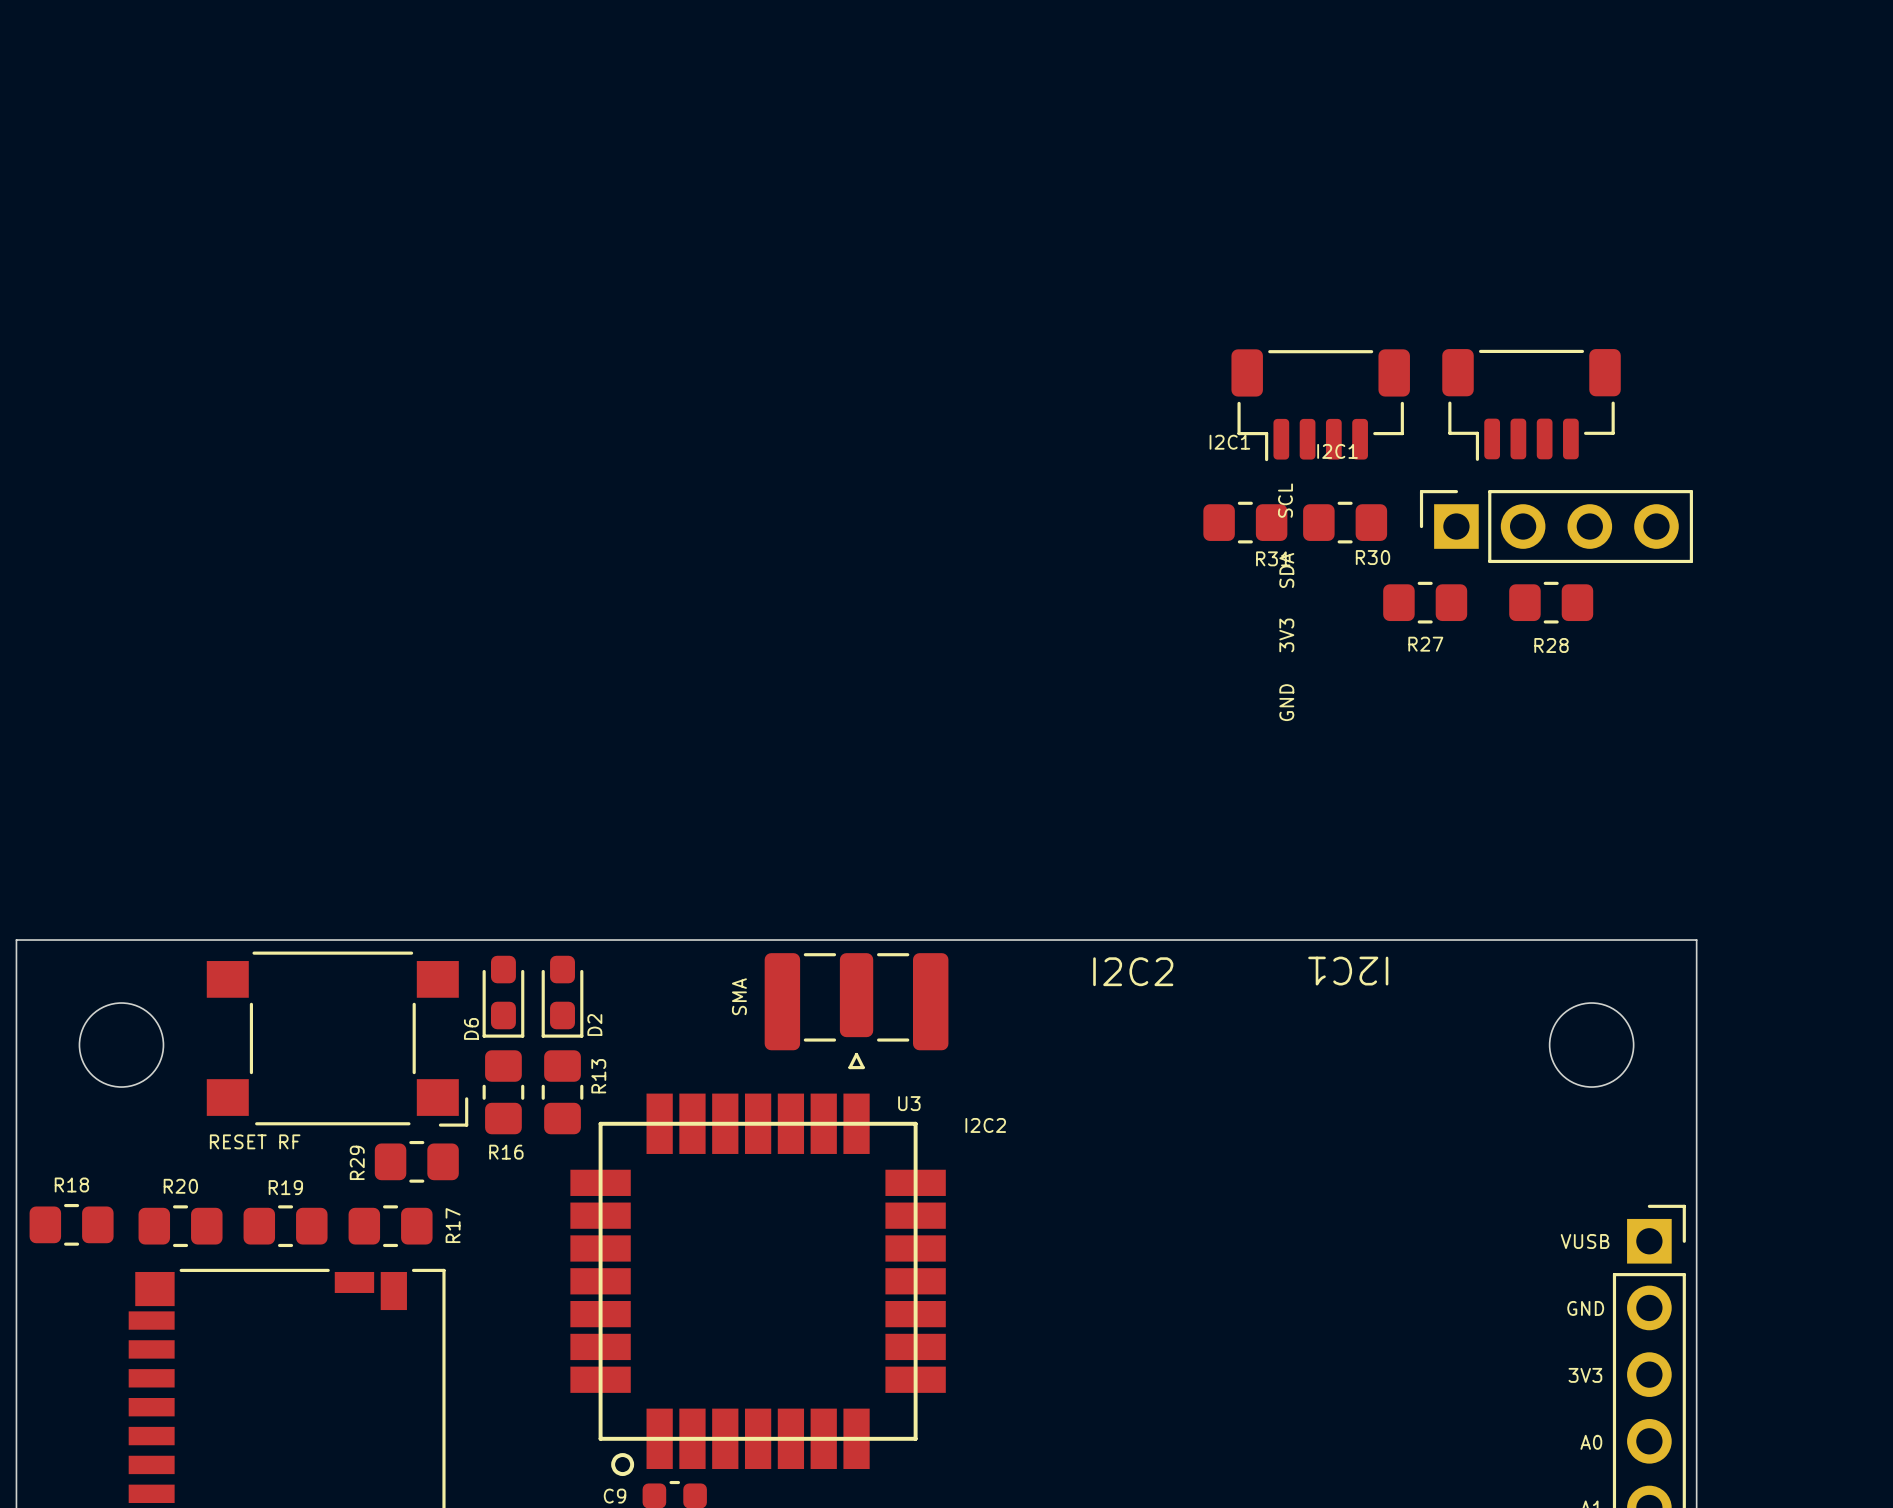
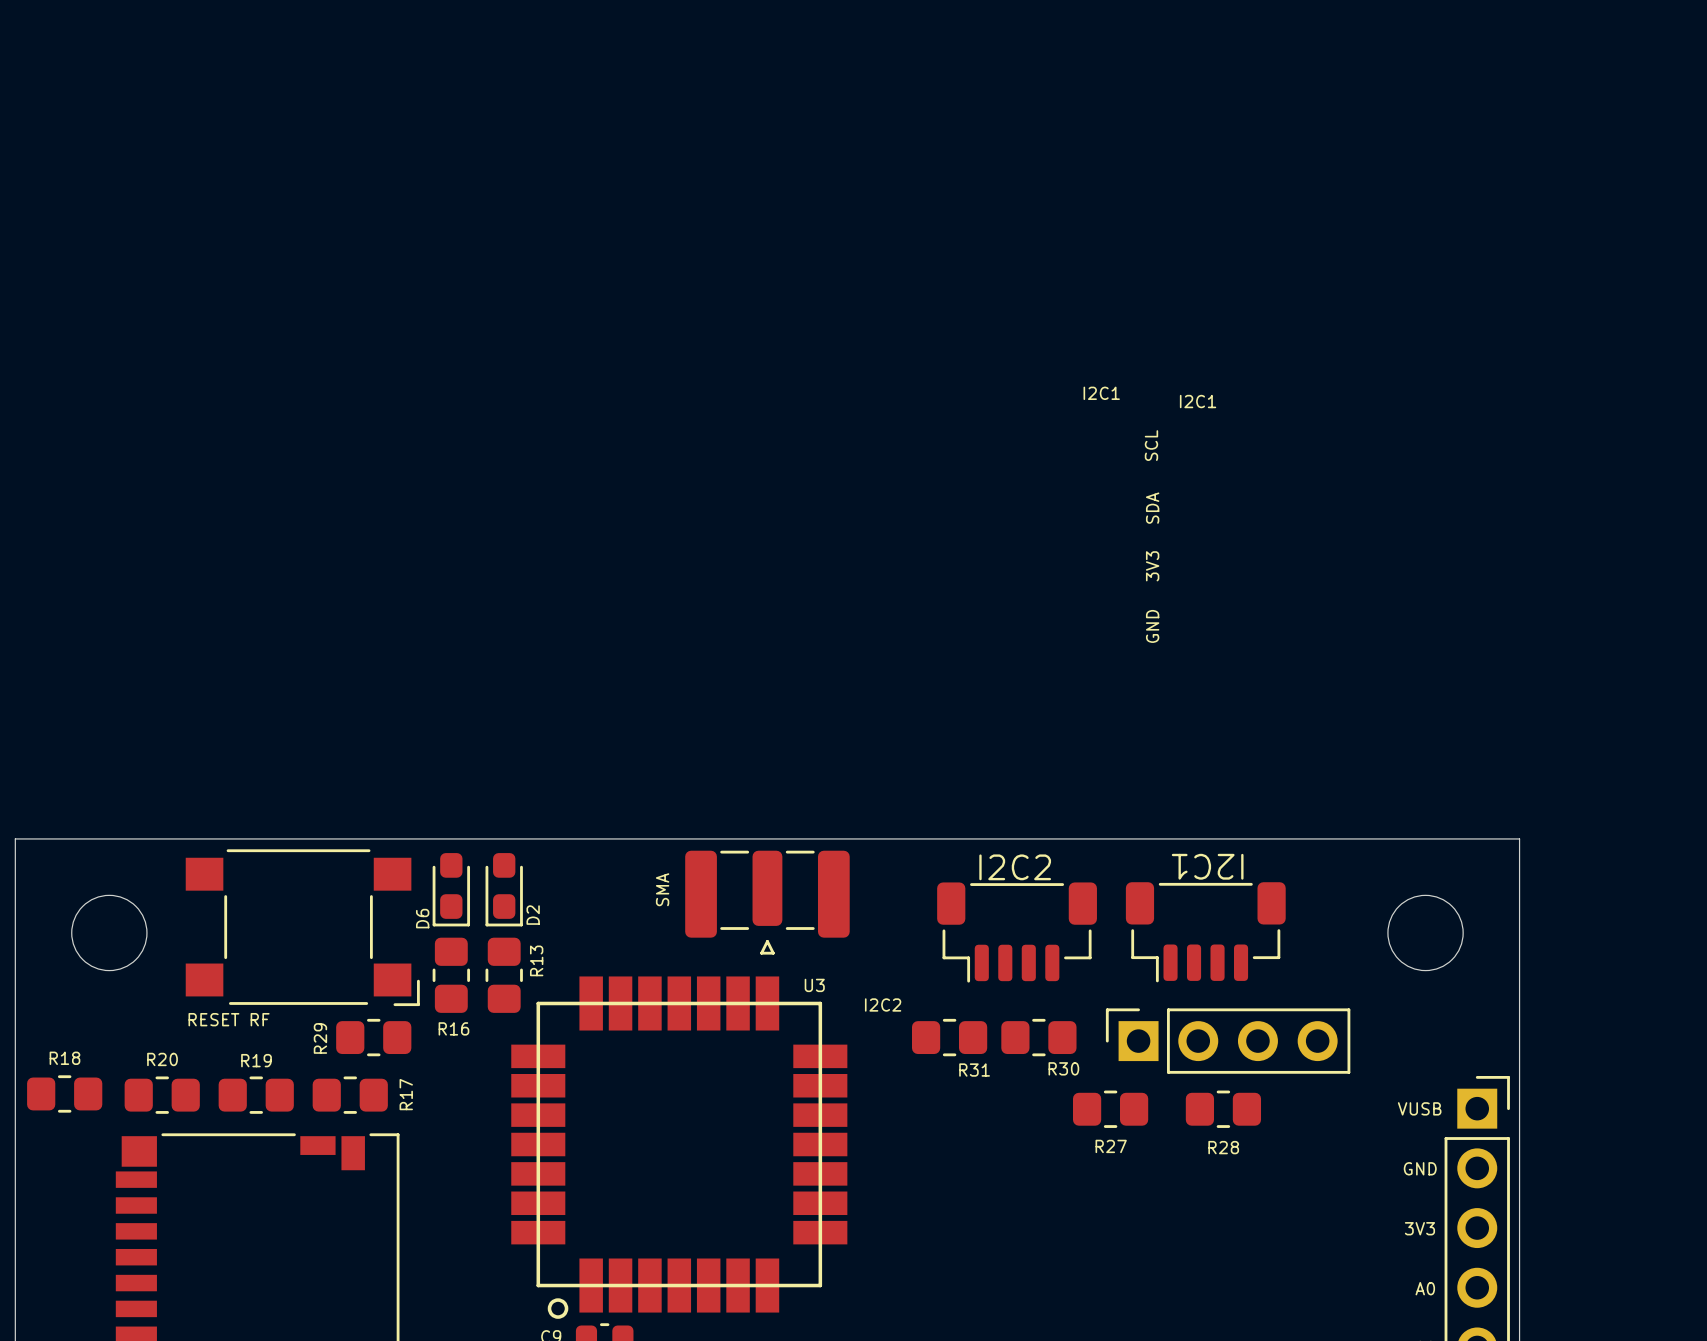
part: (1531, 404) -> none
part: (1320, 405) -> none
R31 position: (1245, 522) -> (949, 1037)
R30 position: (1345, 522) -> (1038, 1037)
part: (1556, 526) -> none
R27 position: (1425, 602) -> (1110, 1109)
R28 position: (1551, 602) -> (1223, 1109)
part: none -> (1017, 932)
part: none -> (1205, 932)
part: none -> (1228, 1041)

